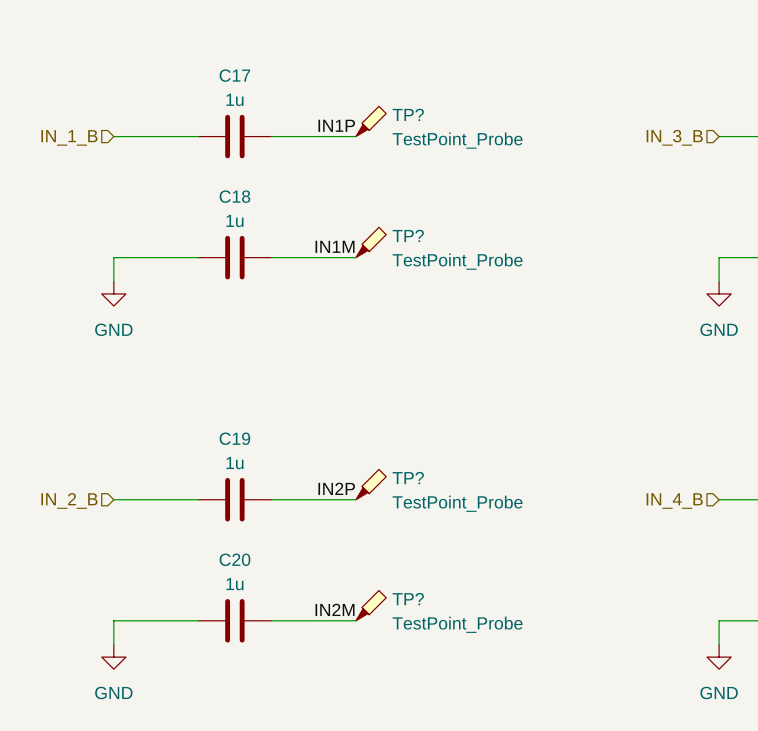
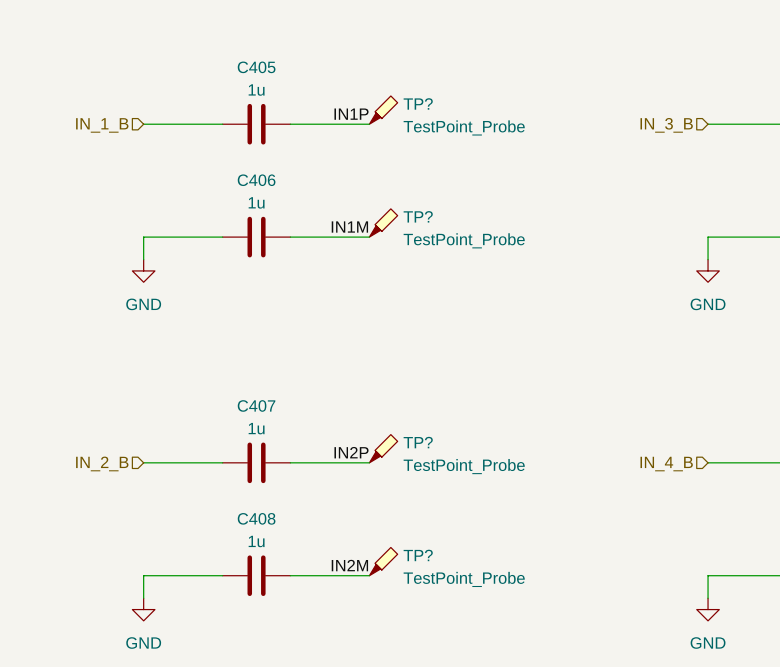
C17 name: C17 (234, 75) -> C405 (256, 67)
C18 name: C18 (234, 196) -> C406 (256, 180)
C19 name: C19 (234, 438) -> C407 (256, 405)
C20 name: C20 (234, 559) -> C408 (256, 518)

